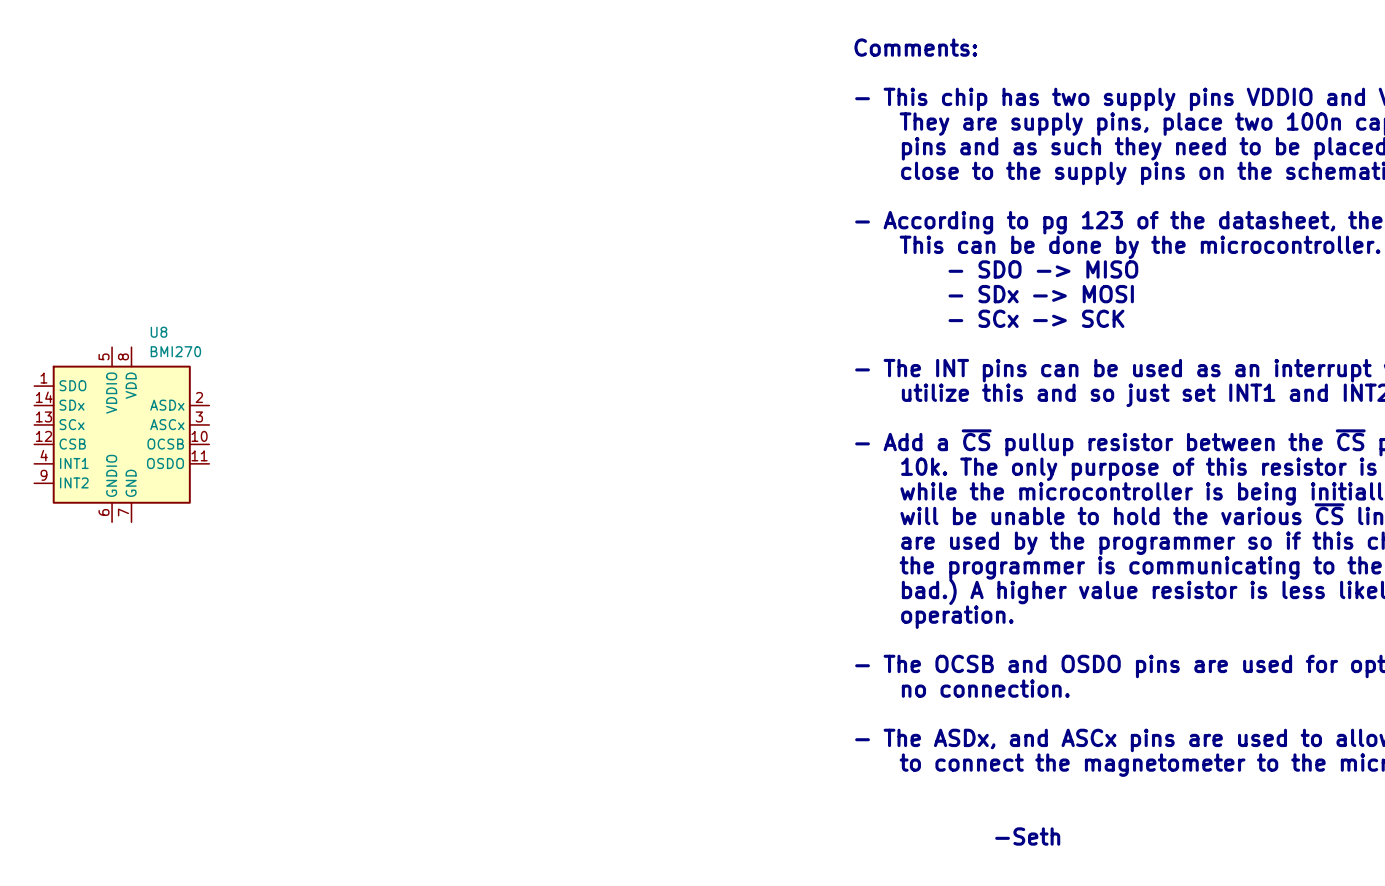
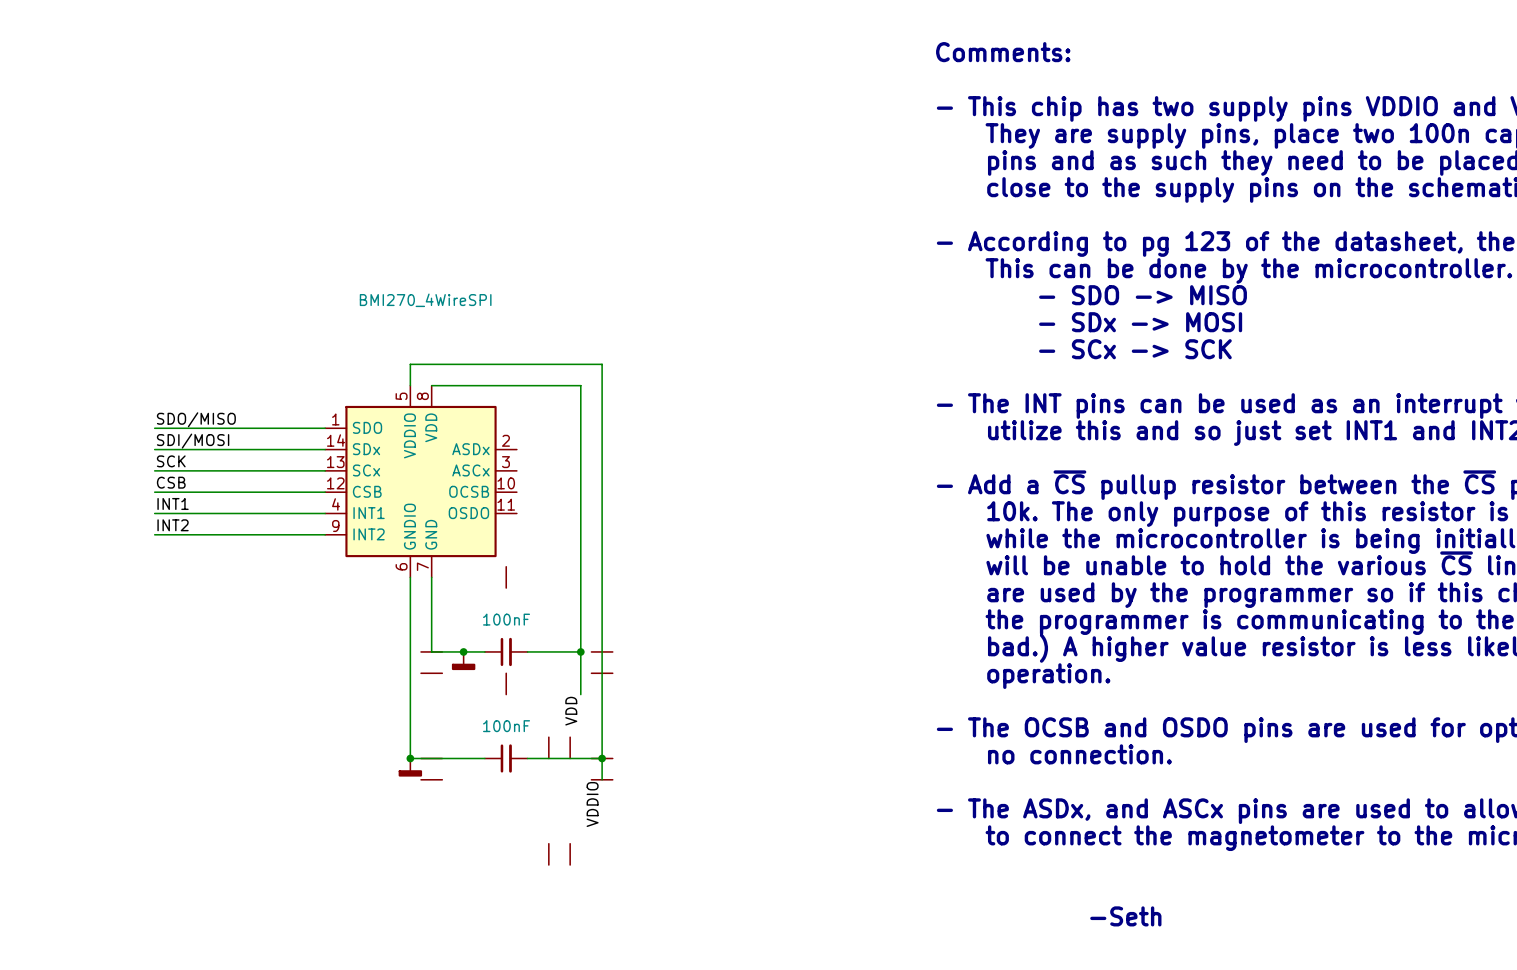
wire: none -> (410, 385) (410, 364) (602, 364) (602, 779)
wire: none -> (431, 385) (580, 385) (580, 694)
label: none -> SDO/MISO (196, 419)
wire: none -> (154, 428) (325, 428)
label: none -> SDI/MOSI (193, 441)
wire: none -> (154, 449) (325, 449)
label: none -> SCK (171, 461)
wire: none -> (154, 470) (325, 470)
U8: BMI270 (121, 434) -> none
BMI270_4WireSPI: none -> (421, 481)
label: none -> CSB (171, 482)
wire: none -> (154, 492) (325, 492)
label: none -> INT1 (173, 503)
wire: none -> (154, 513) (325, 513)
label: none -> INT2 (173, 525)
wire: none -> (154, 534) (325, 534)
wire: none -> (410, 577) (410, 758) (484, 758)
wire: none -> (431, 577) (431, 651) (484, 651)
junction: none -> (463, 651)
wire: none -> (527, 651) (580, 651)
junction: none -> (580, 651)
power symbol: none -> (463, 661)
part: none -> 100nF (516, 662)
label: none -> VDD (571, 711)
junction: none -> (410, 758)
wire: none -> (527, 758) (602, 758)
junction: none -> (602, 758)
power symbol: none -> (410, 767)
part: none -> 100nF (516, 769)
label: none -> VDDIO (592, 804)

